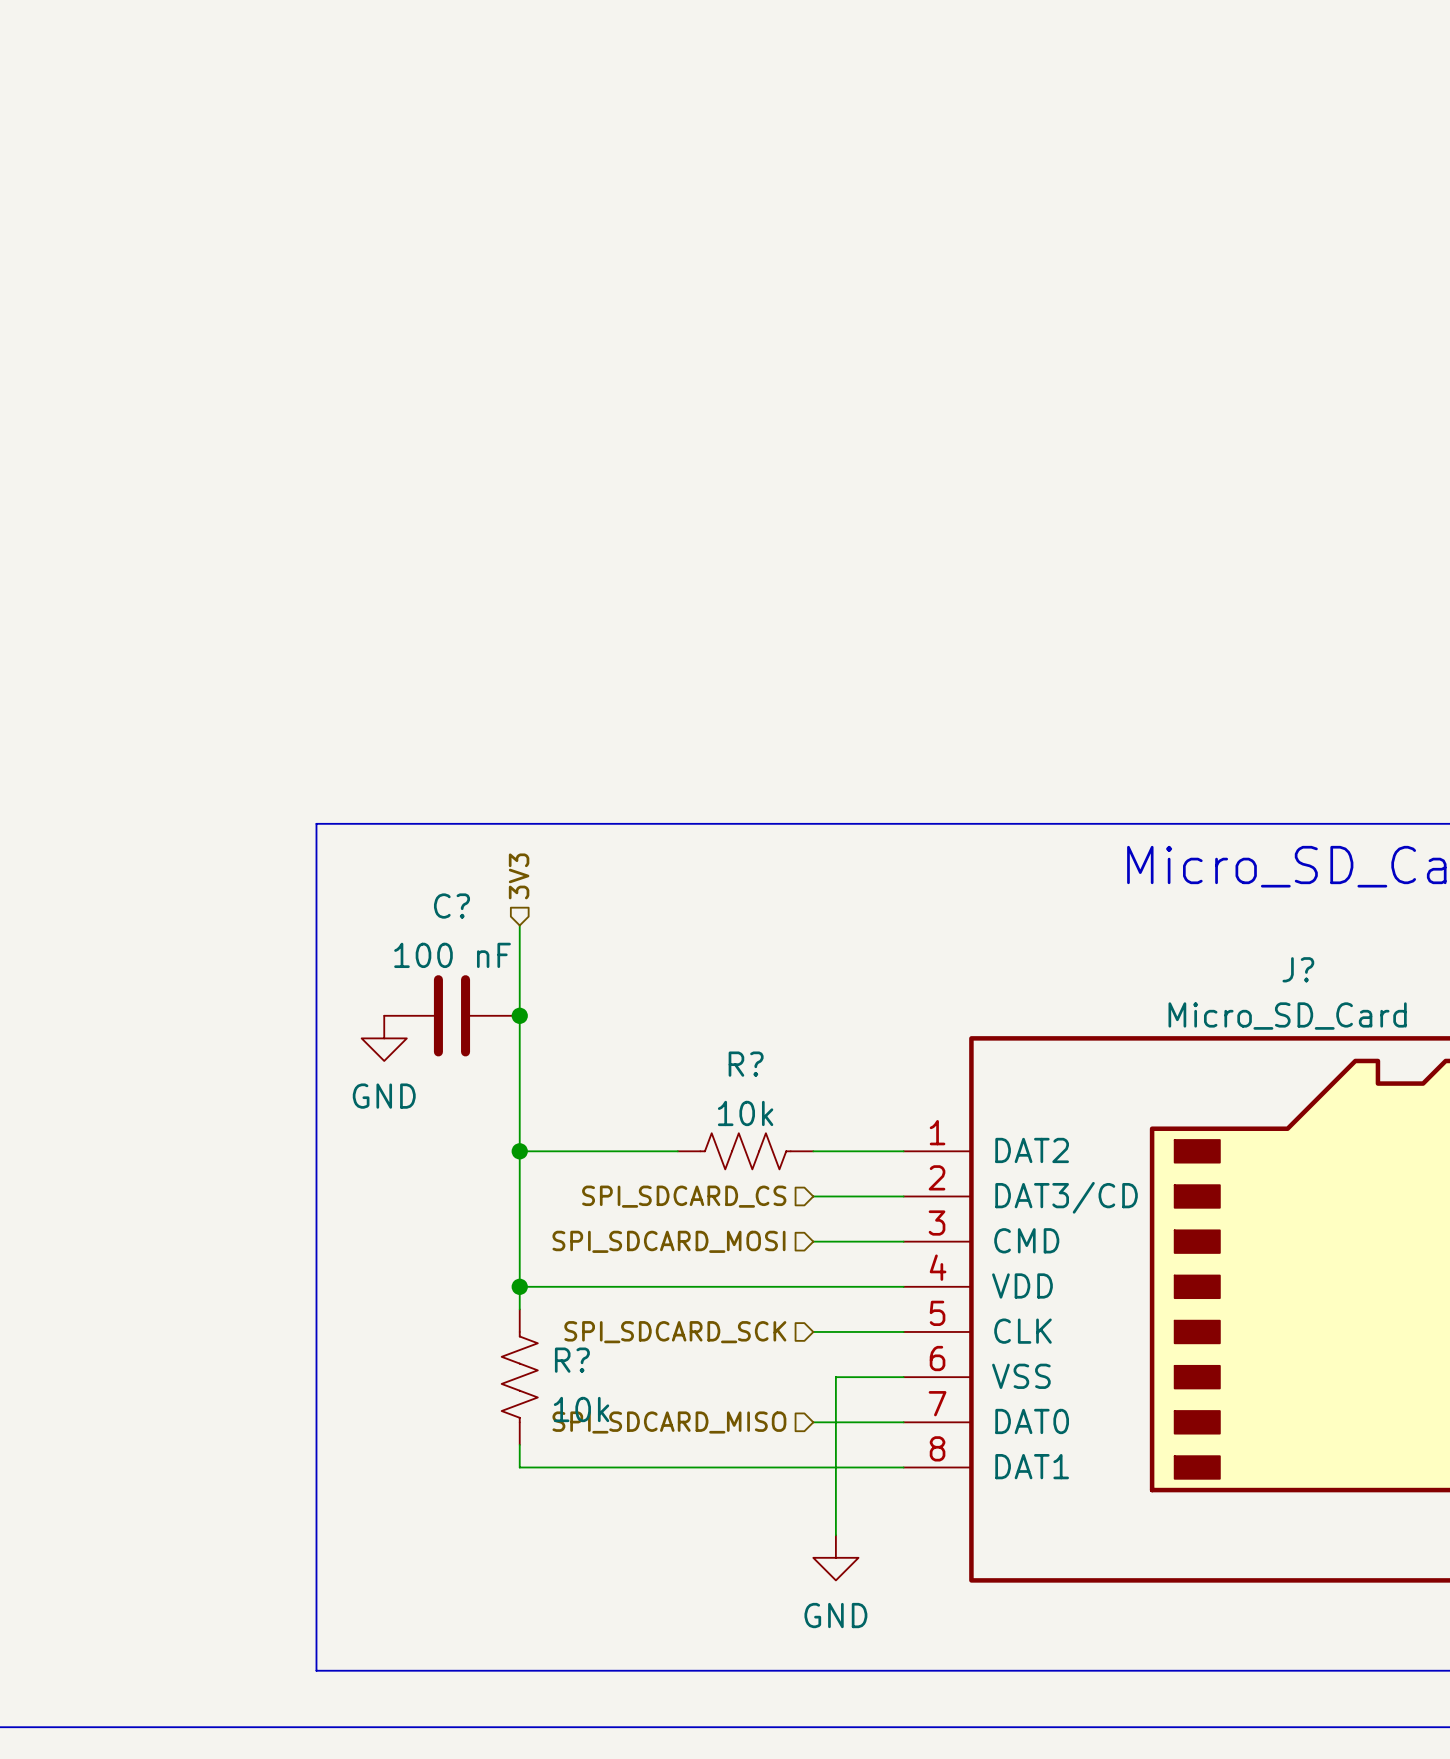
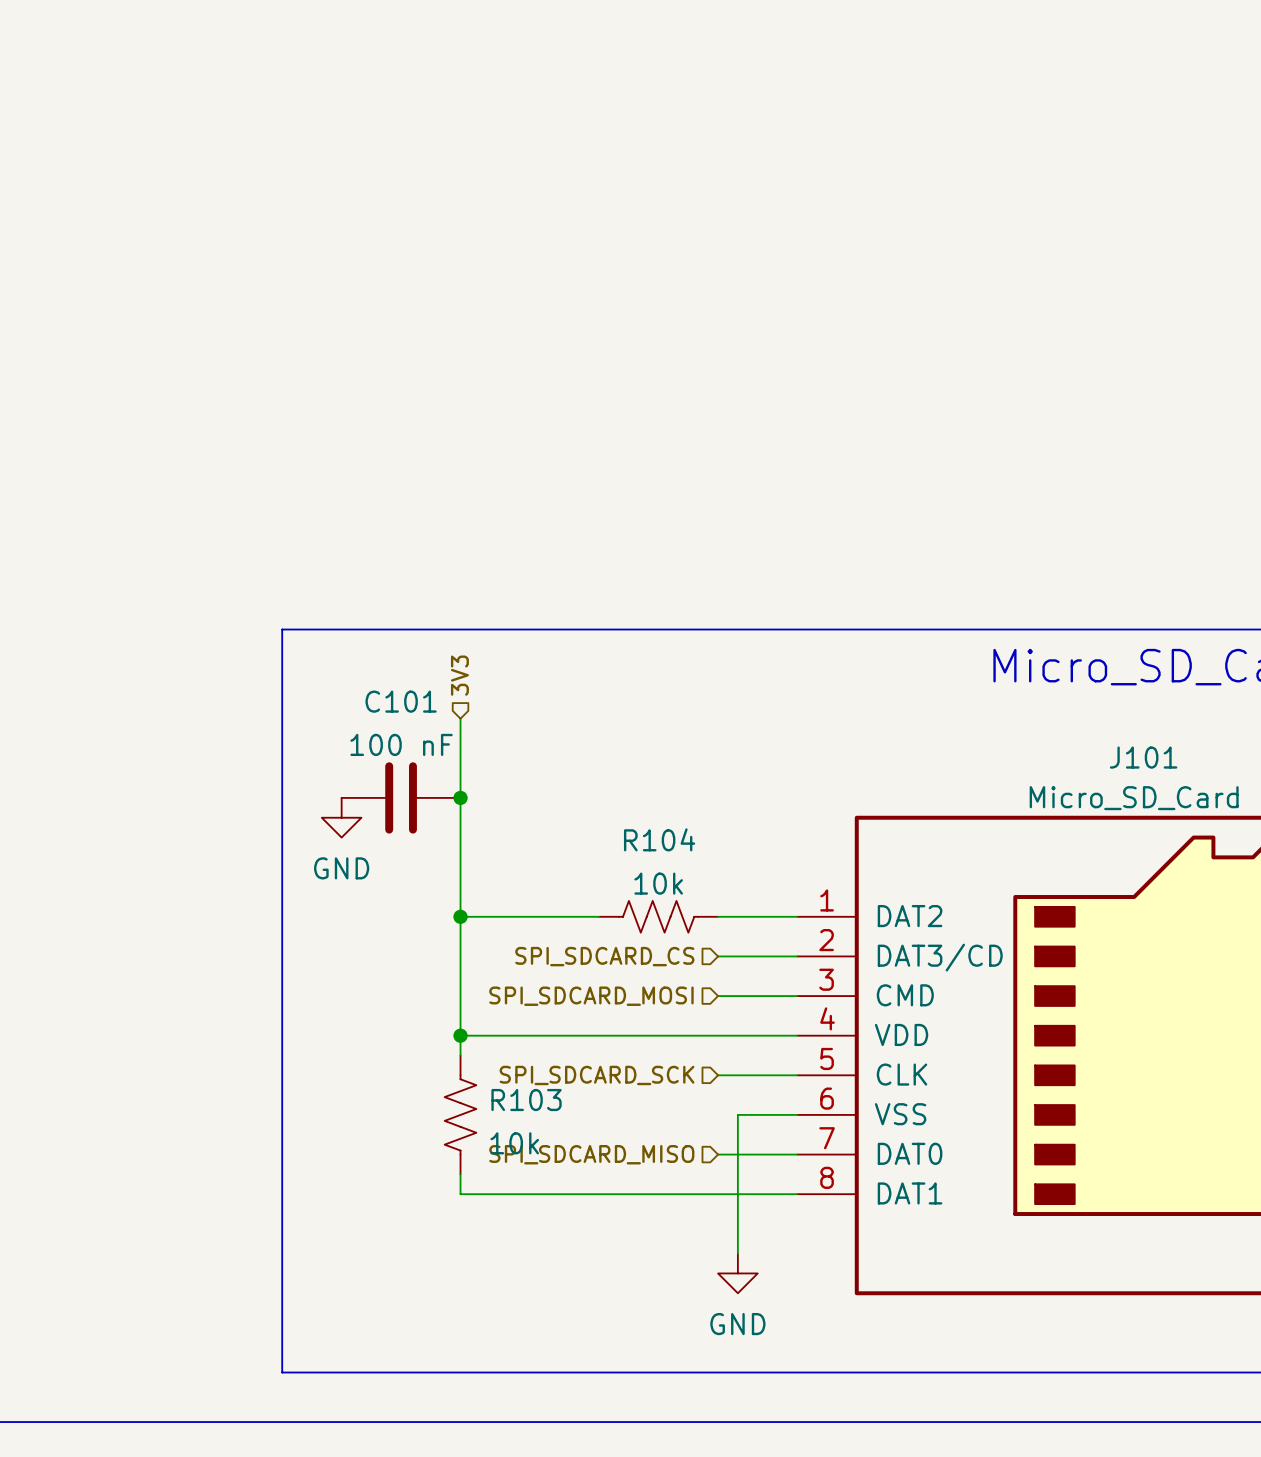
C? name: C? (451, 906) -> C101 (401, 701)
J? name: J? (1298, 969) -> J101 (1143, 757)
R? name: R? (746, 1064) -> R104 (659, 839)
R? name: R? (572, 1360) -> R103 (526, 1100)

